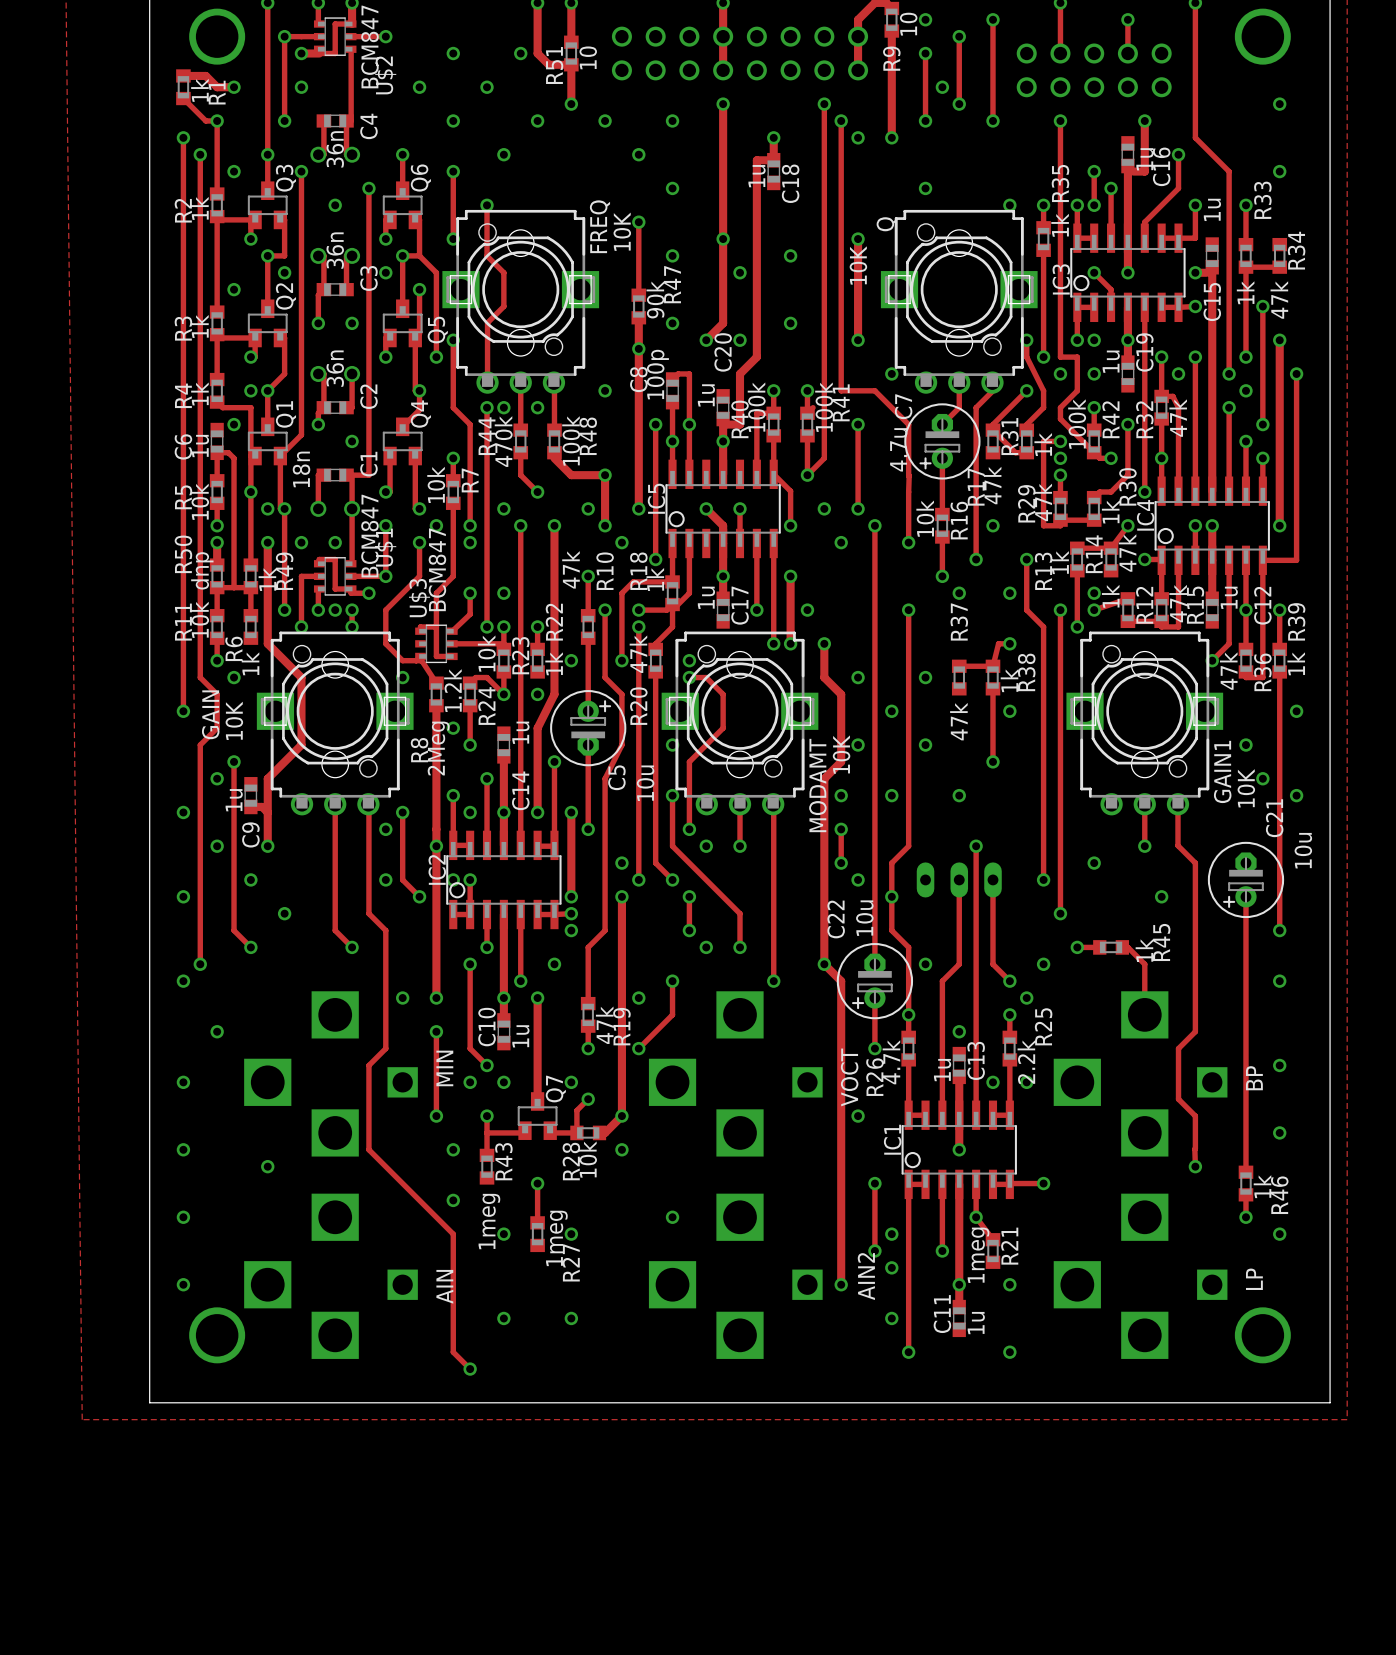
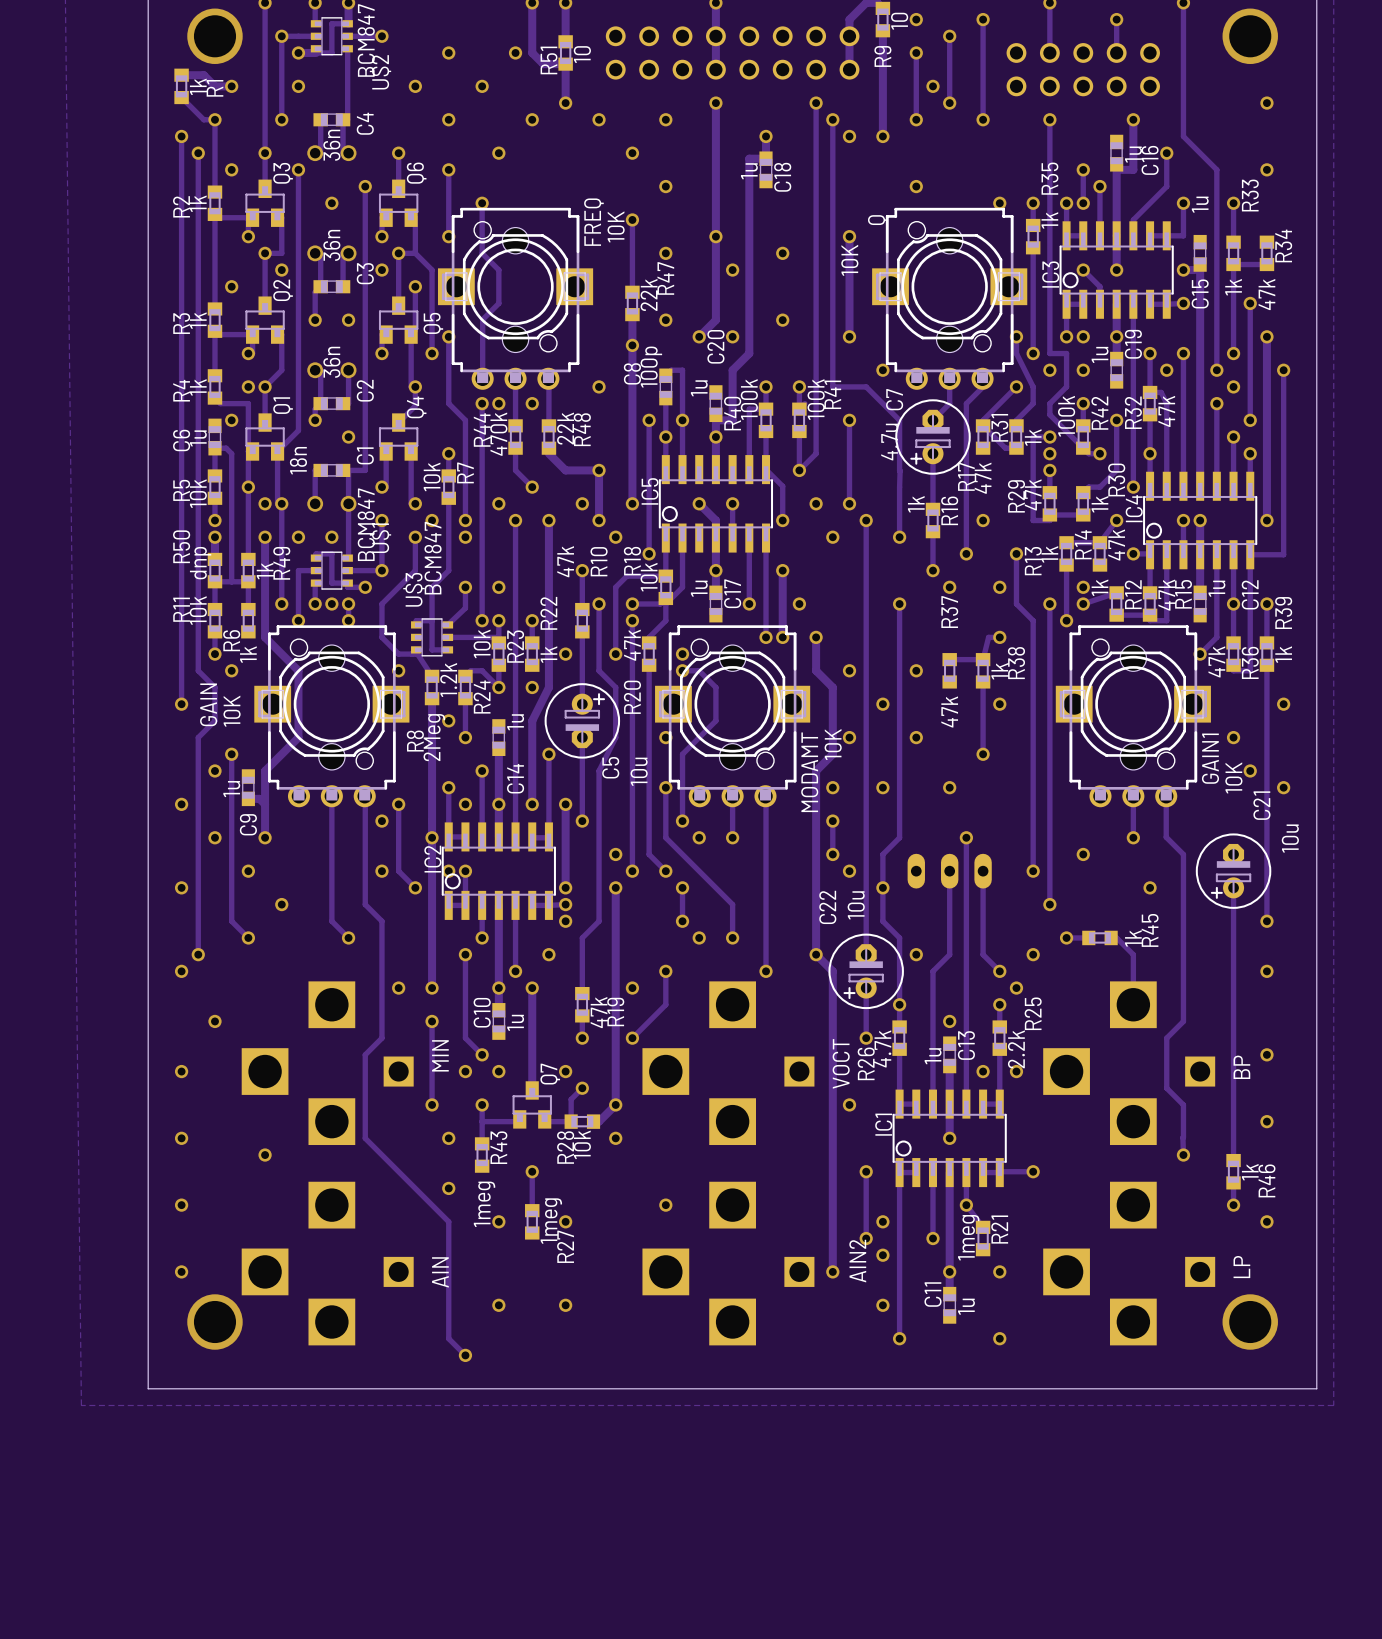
R47 value: 90k (655, 299) -> 22k (649, 294)
R48 value: 100k (571, 440) -> 22k (565, 428)
R16 value: 10k (925, 518) -> 1k (916, 504)
R18 value: 1k (655, 579) -> 10k (649, 577)

